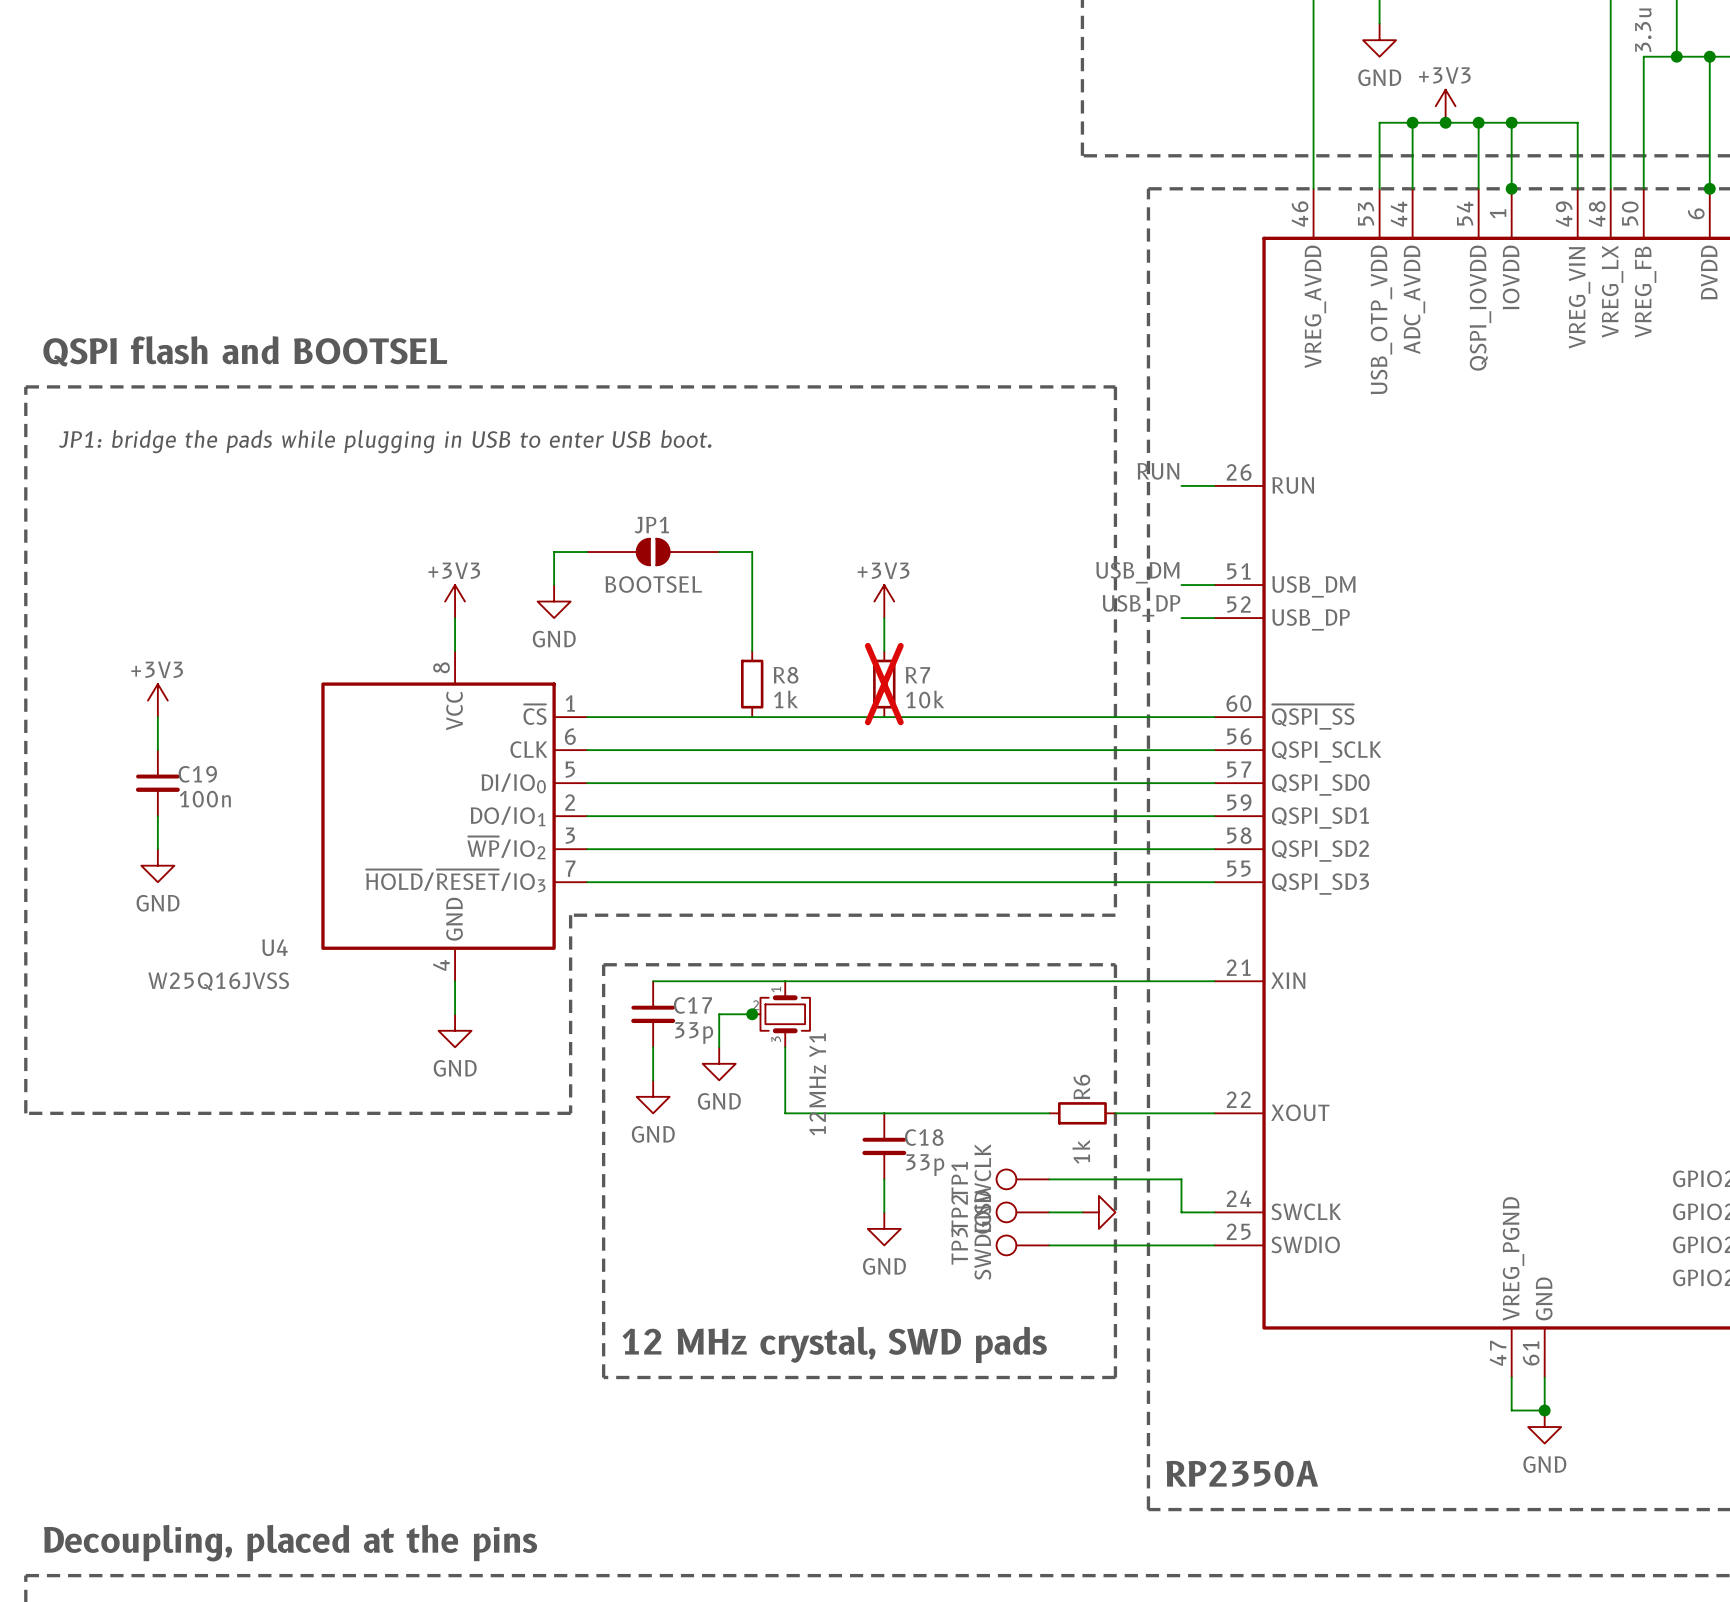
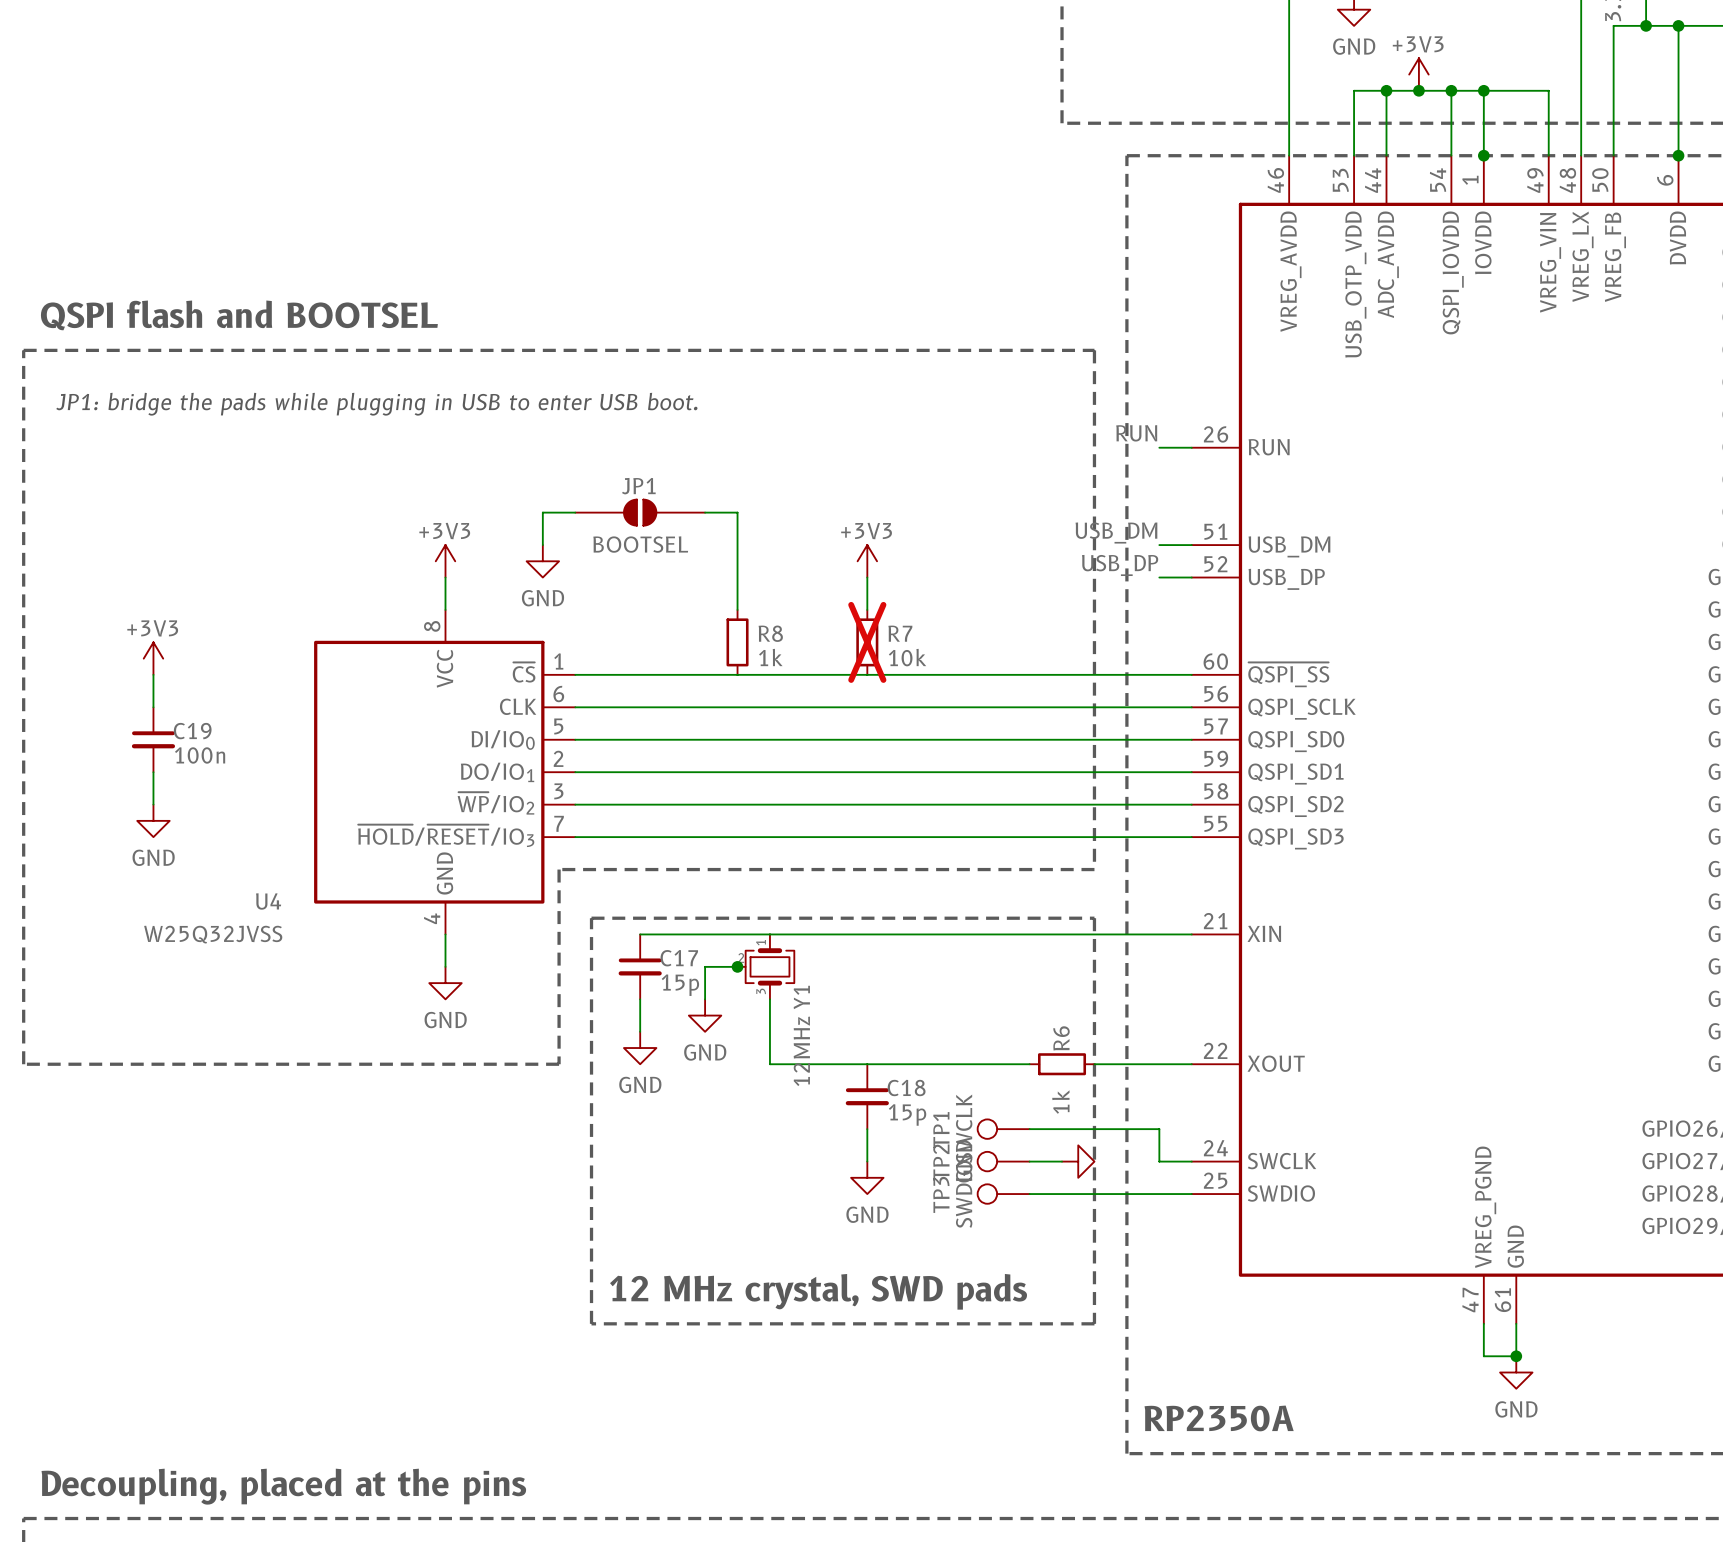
U4 value: W25Q16JVSS (218, 981) -> W25Q32JVSS (213, 934)
C17 value: 33p (694, 1032) -> 15p (680, 985)
C18 value: 33p (925, 1165) -> 15p (907, 1114)

